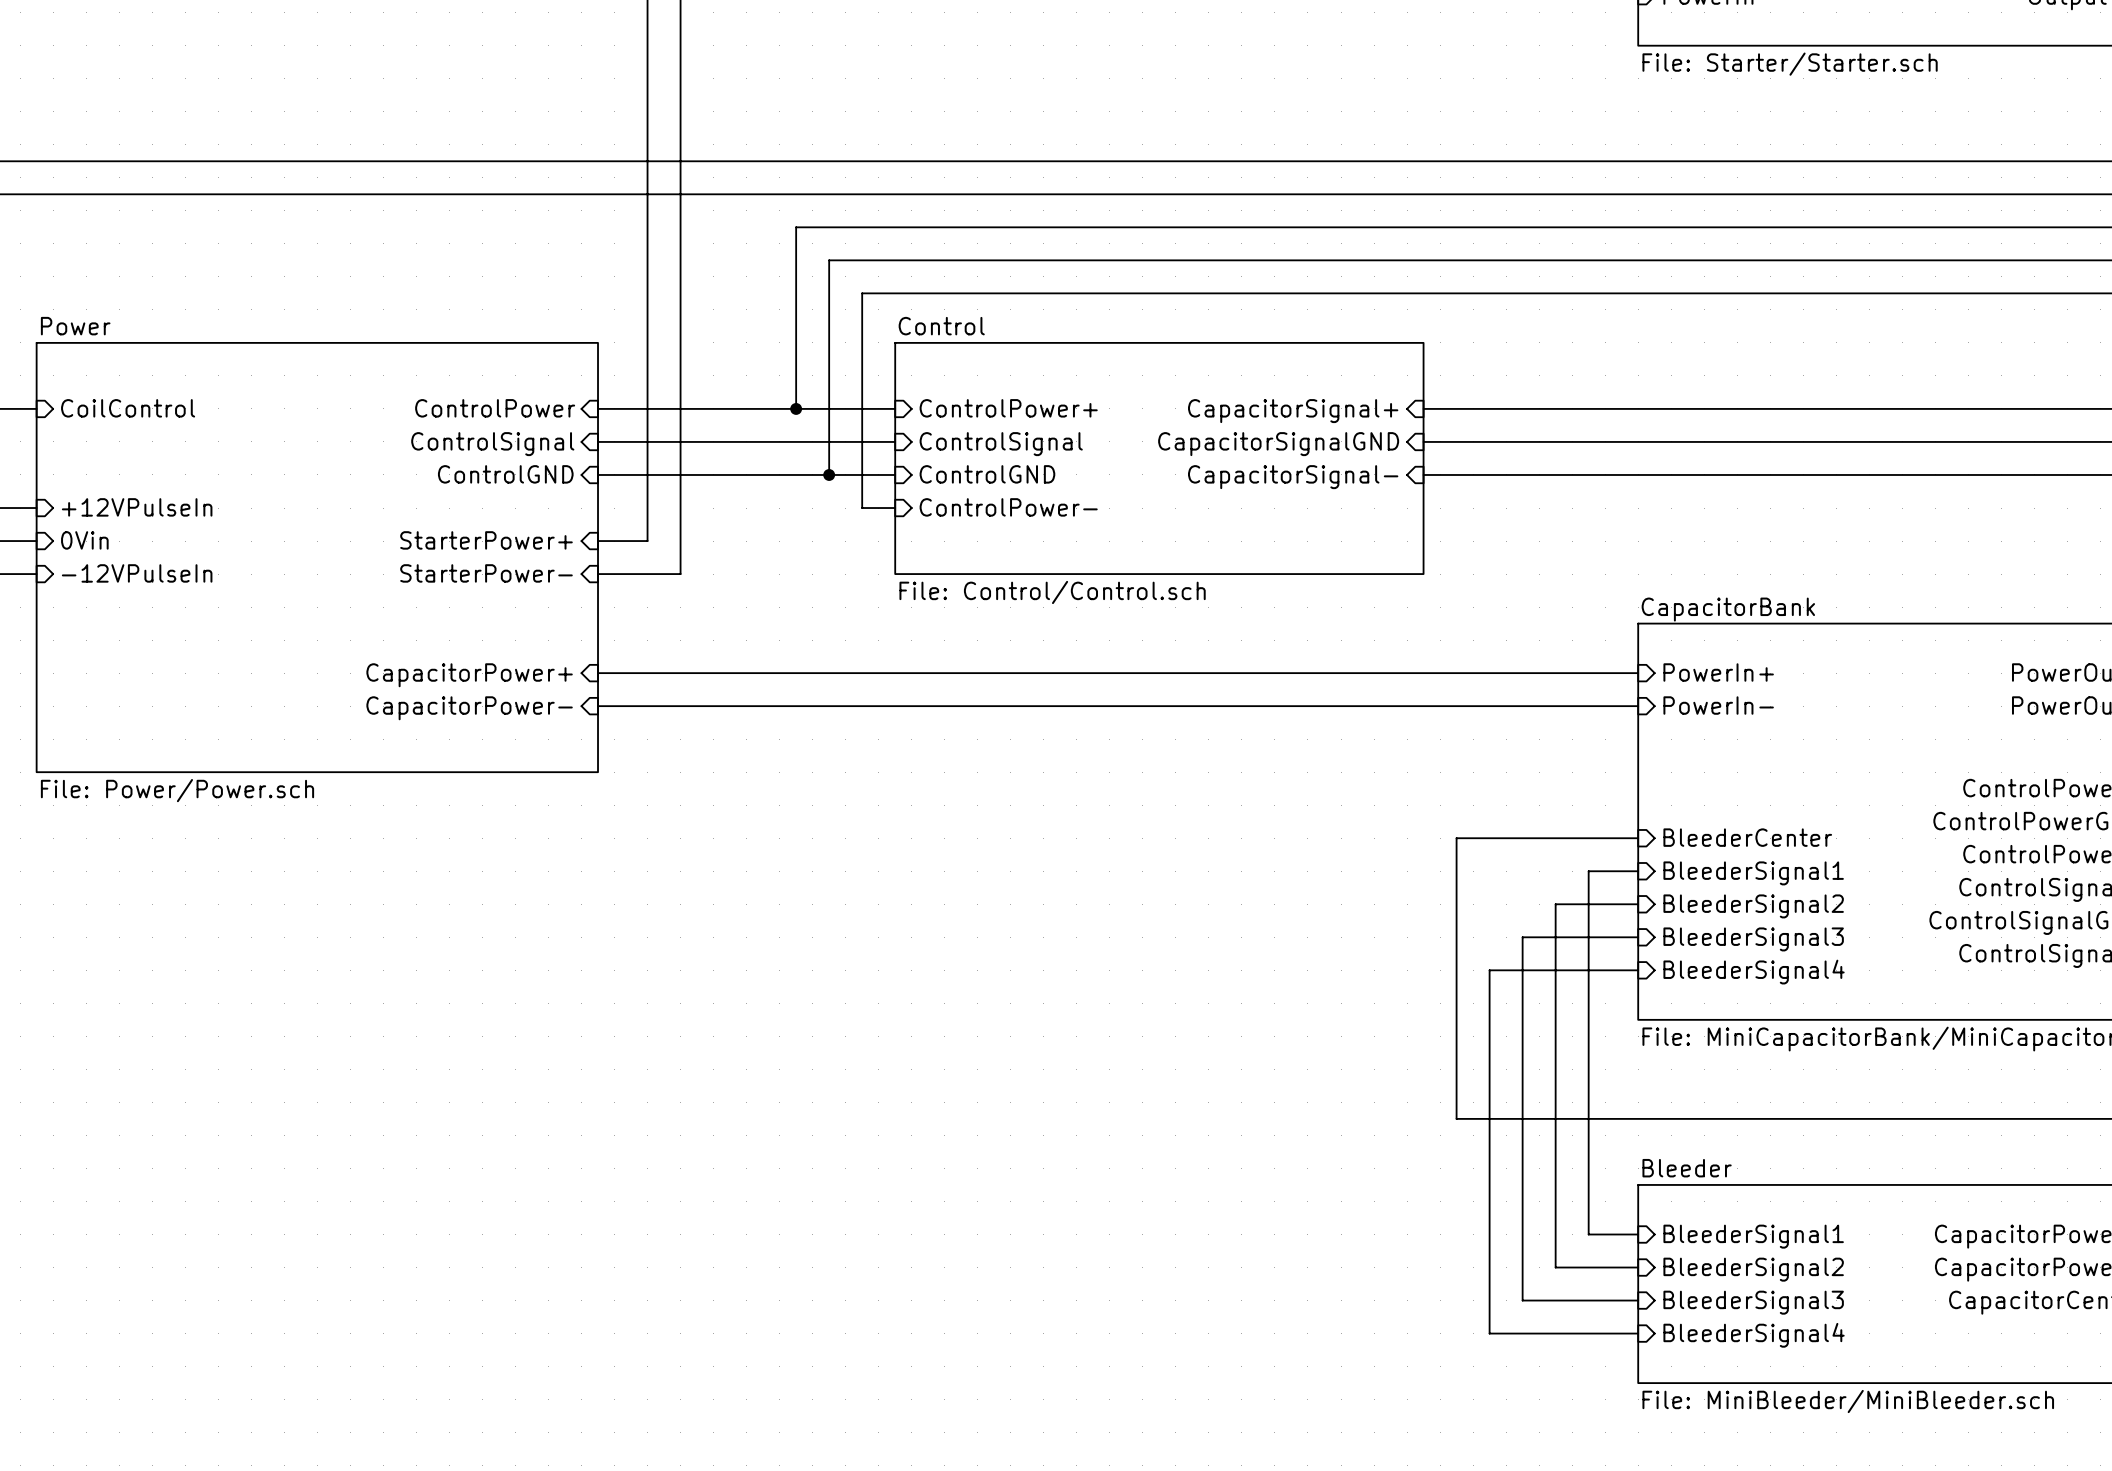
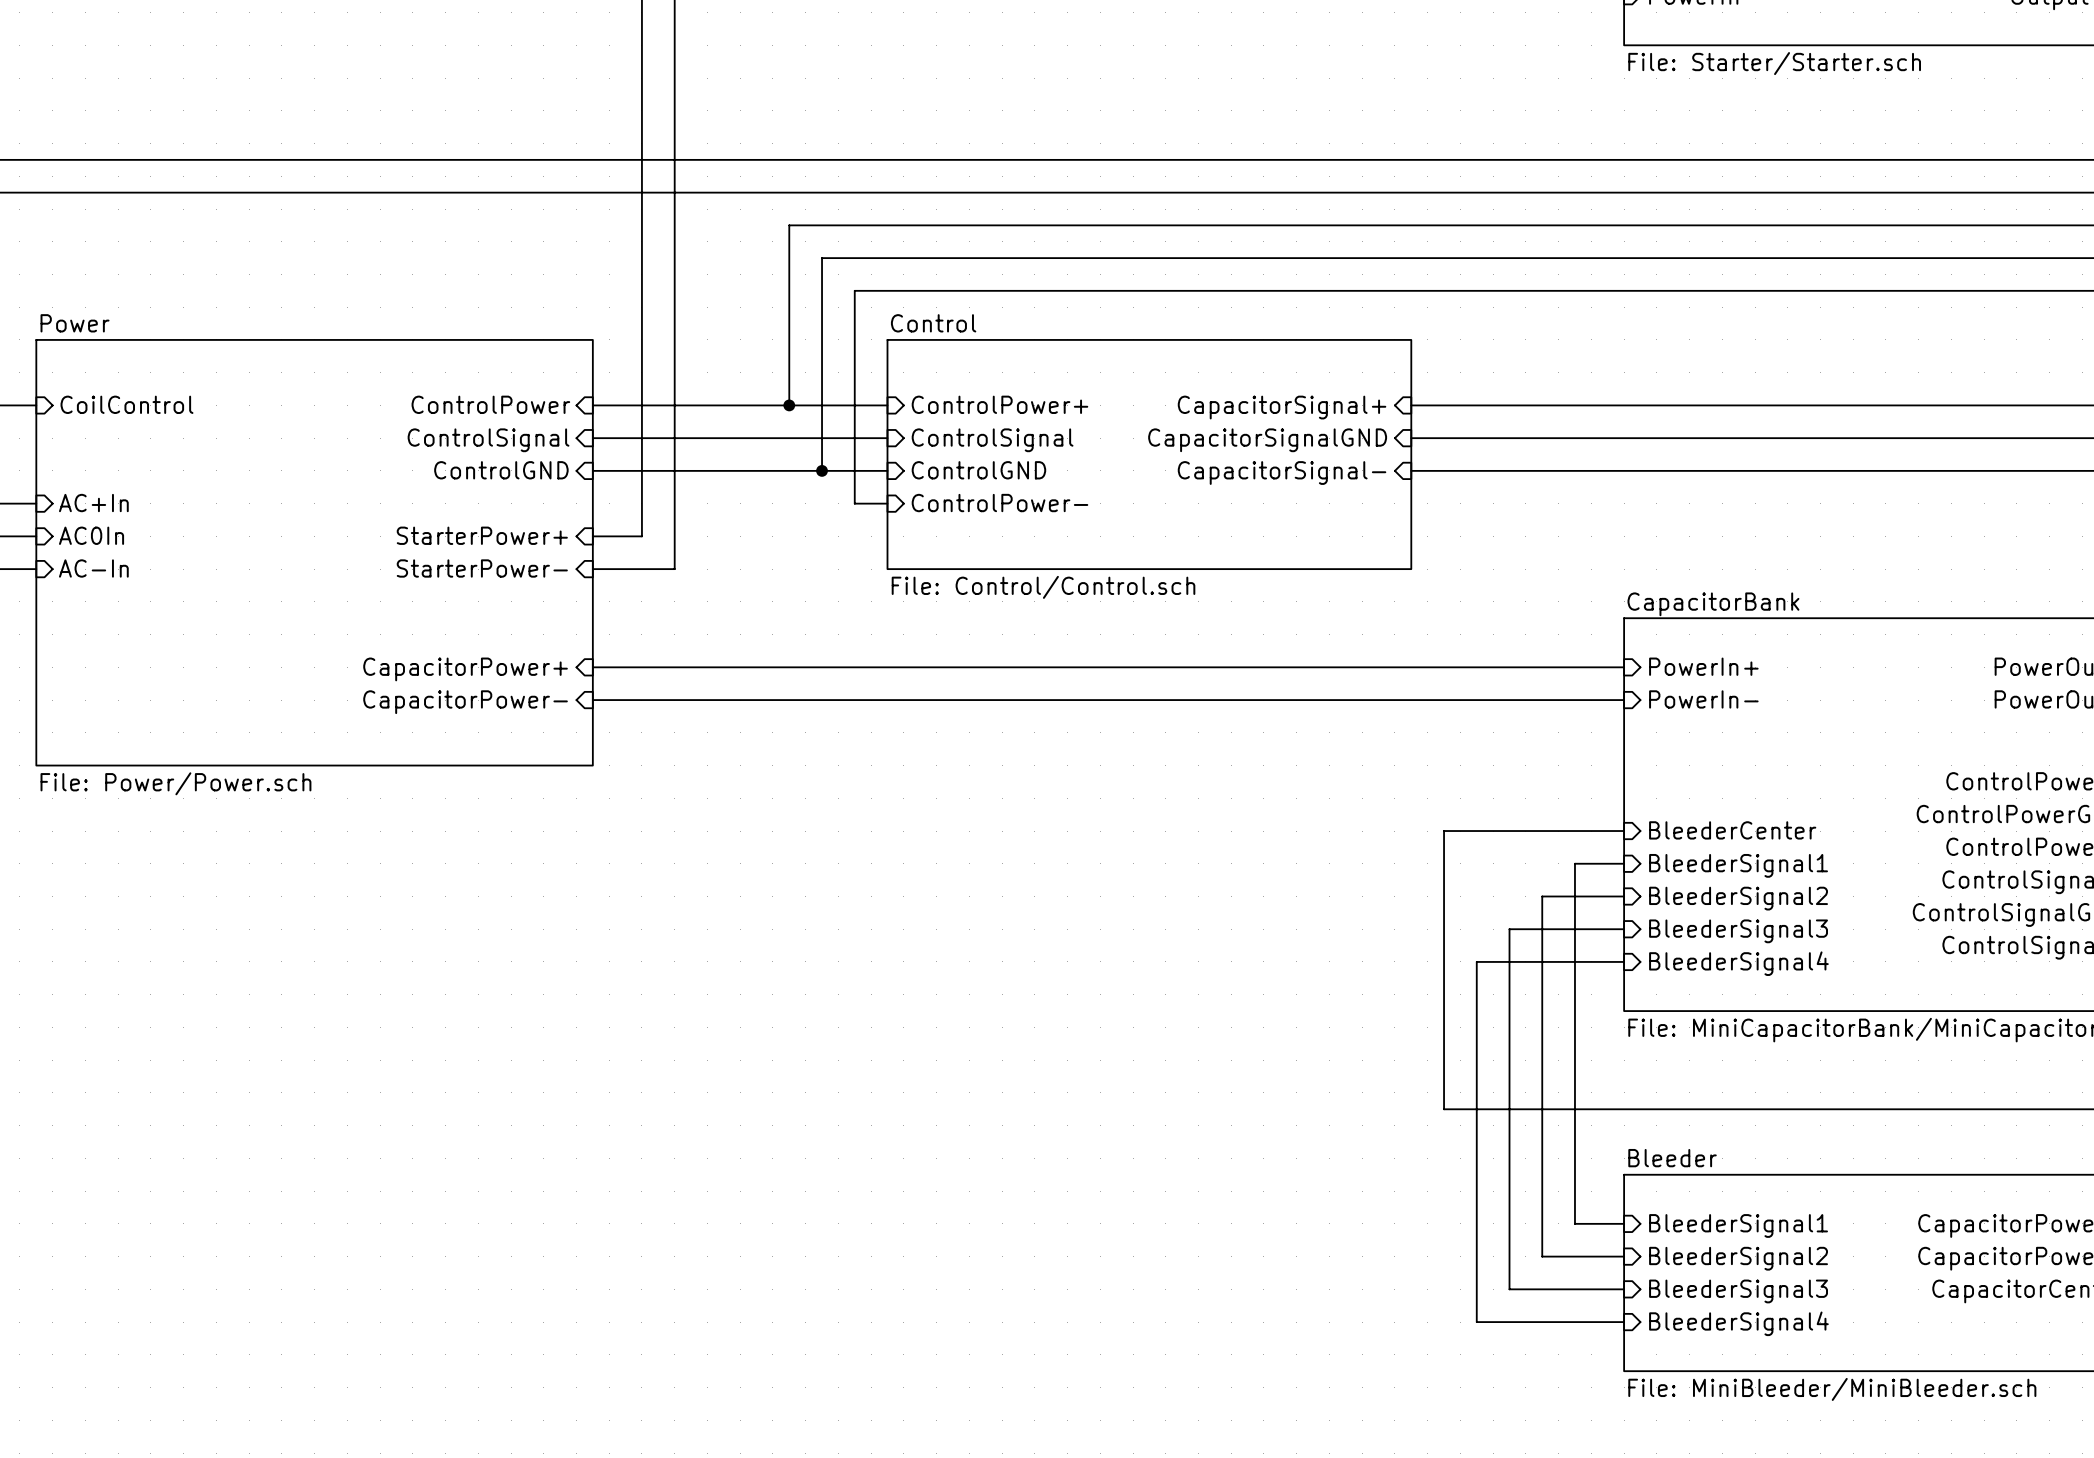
sheet pin: +12VPulseIn (137, 507) -> AC+In (93, 503)
sheet pin: 0Vin (84, 540) -> AC0In (91, 535)
sheet pin: -12VPulseIn (137, 573) -> AC-In (93, 568)

